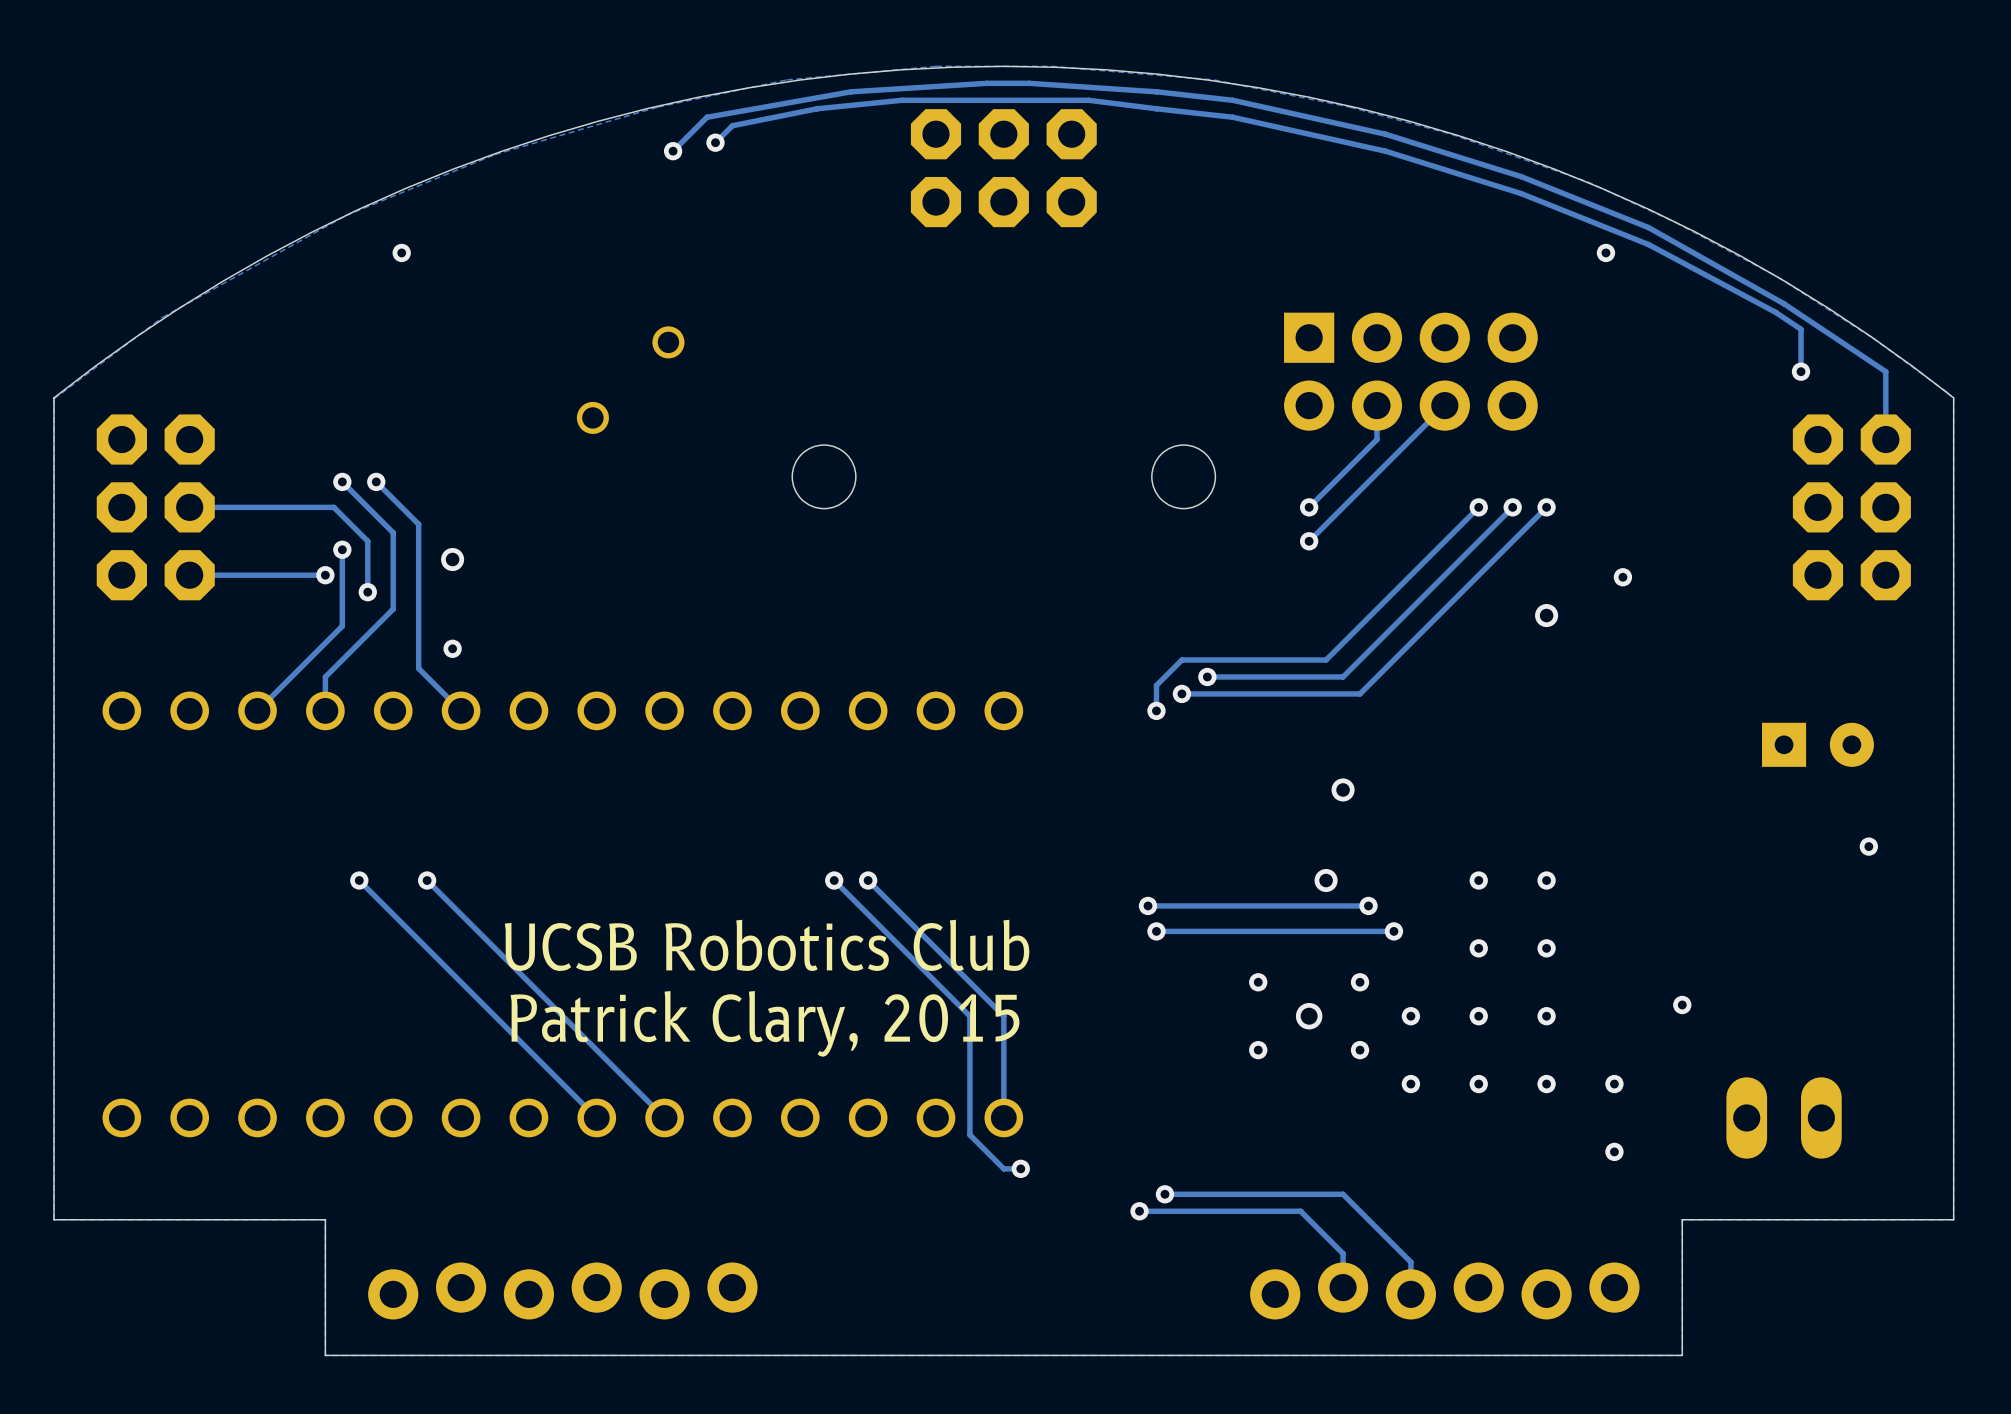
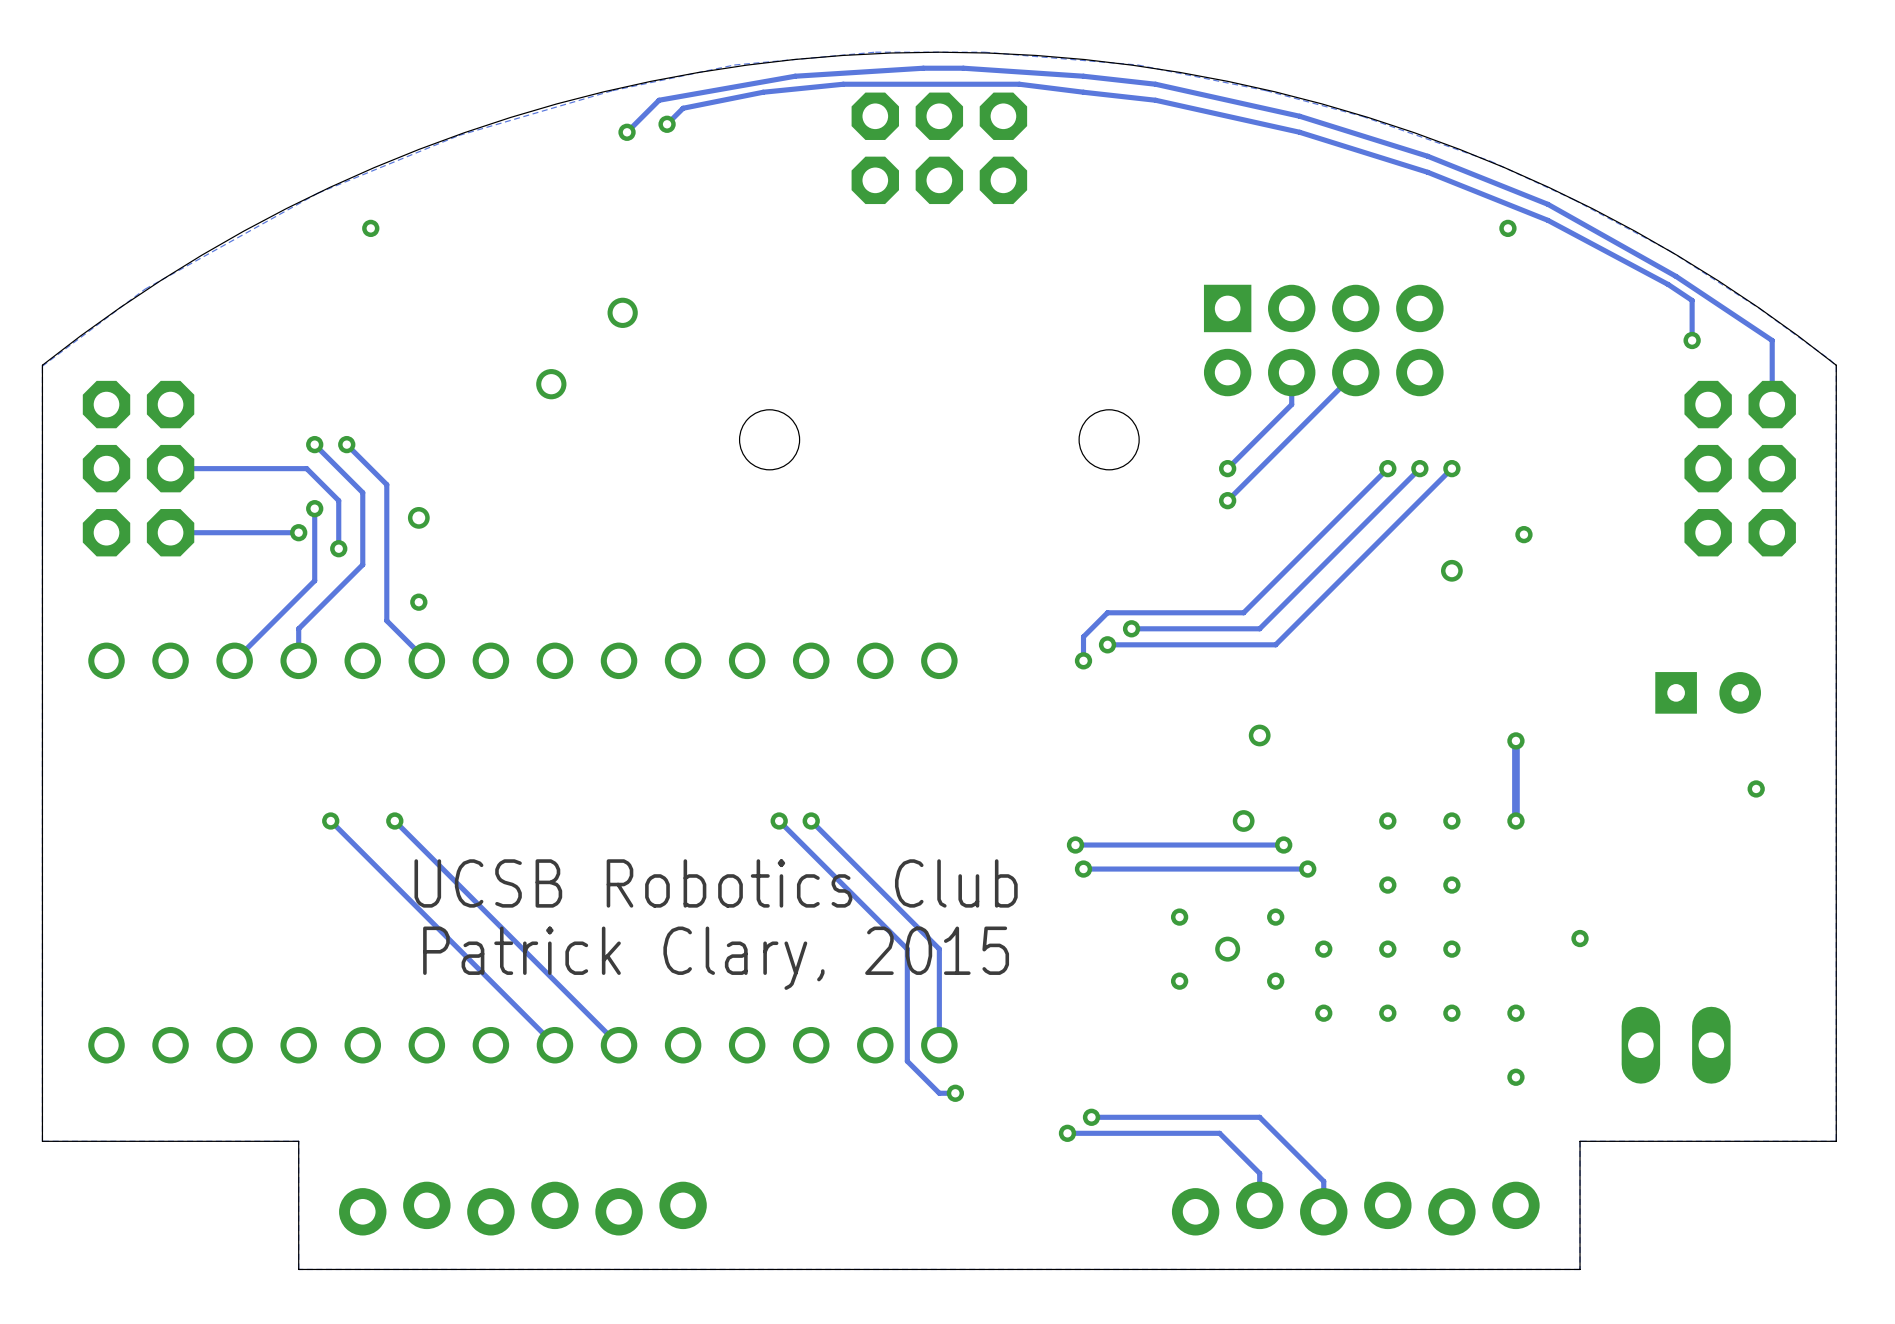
track: none -> (1515, 740) (1515, 820)
via: none -> (1515, 740)
via: none -> (1515, 820)

